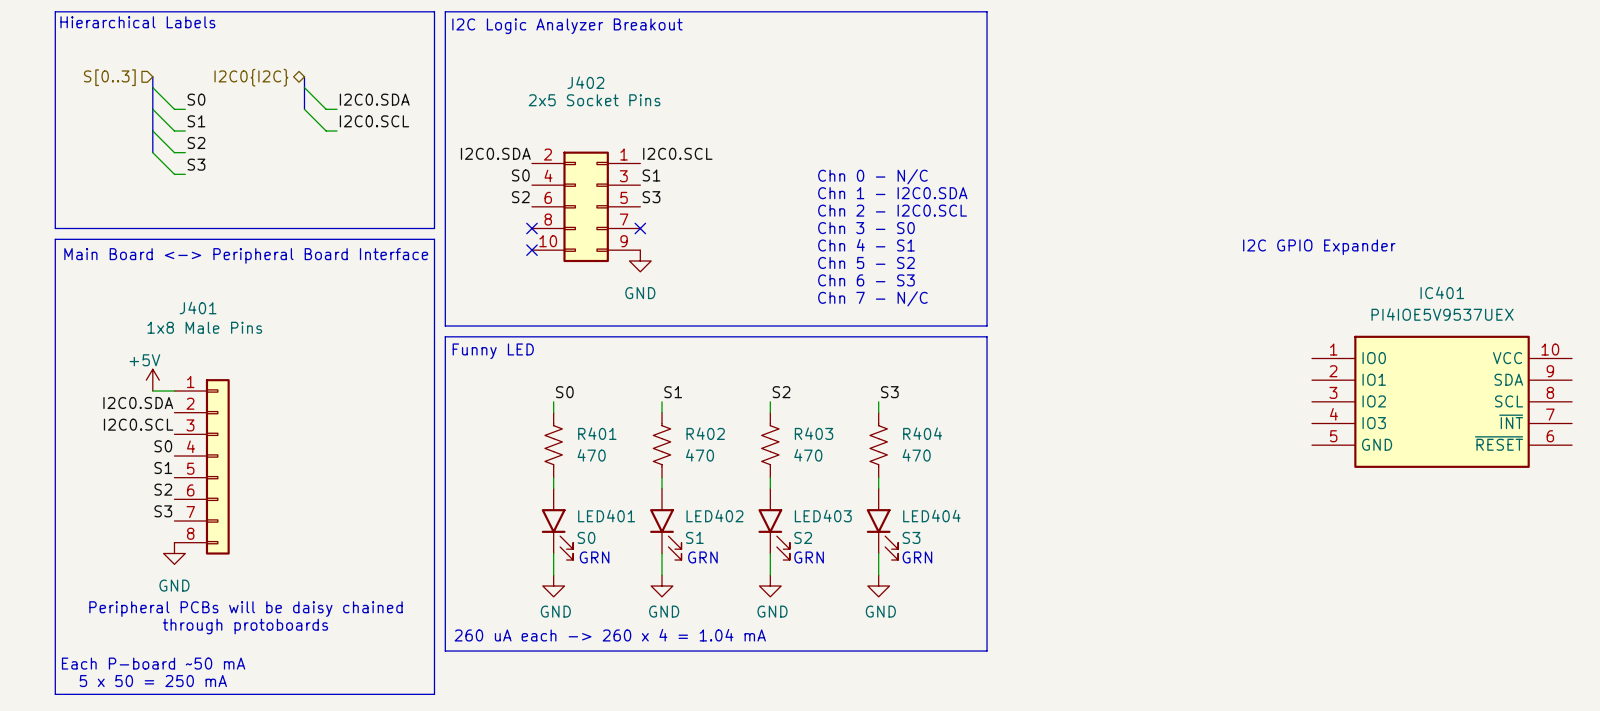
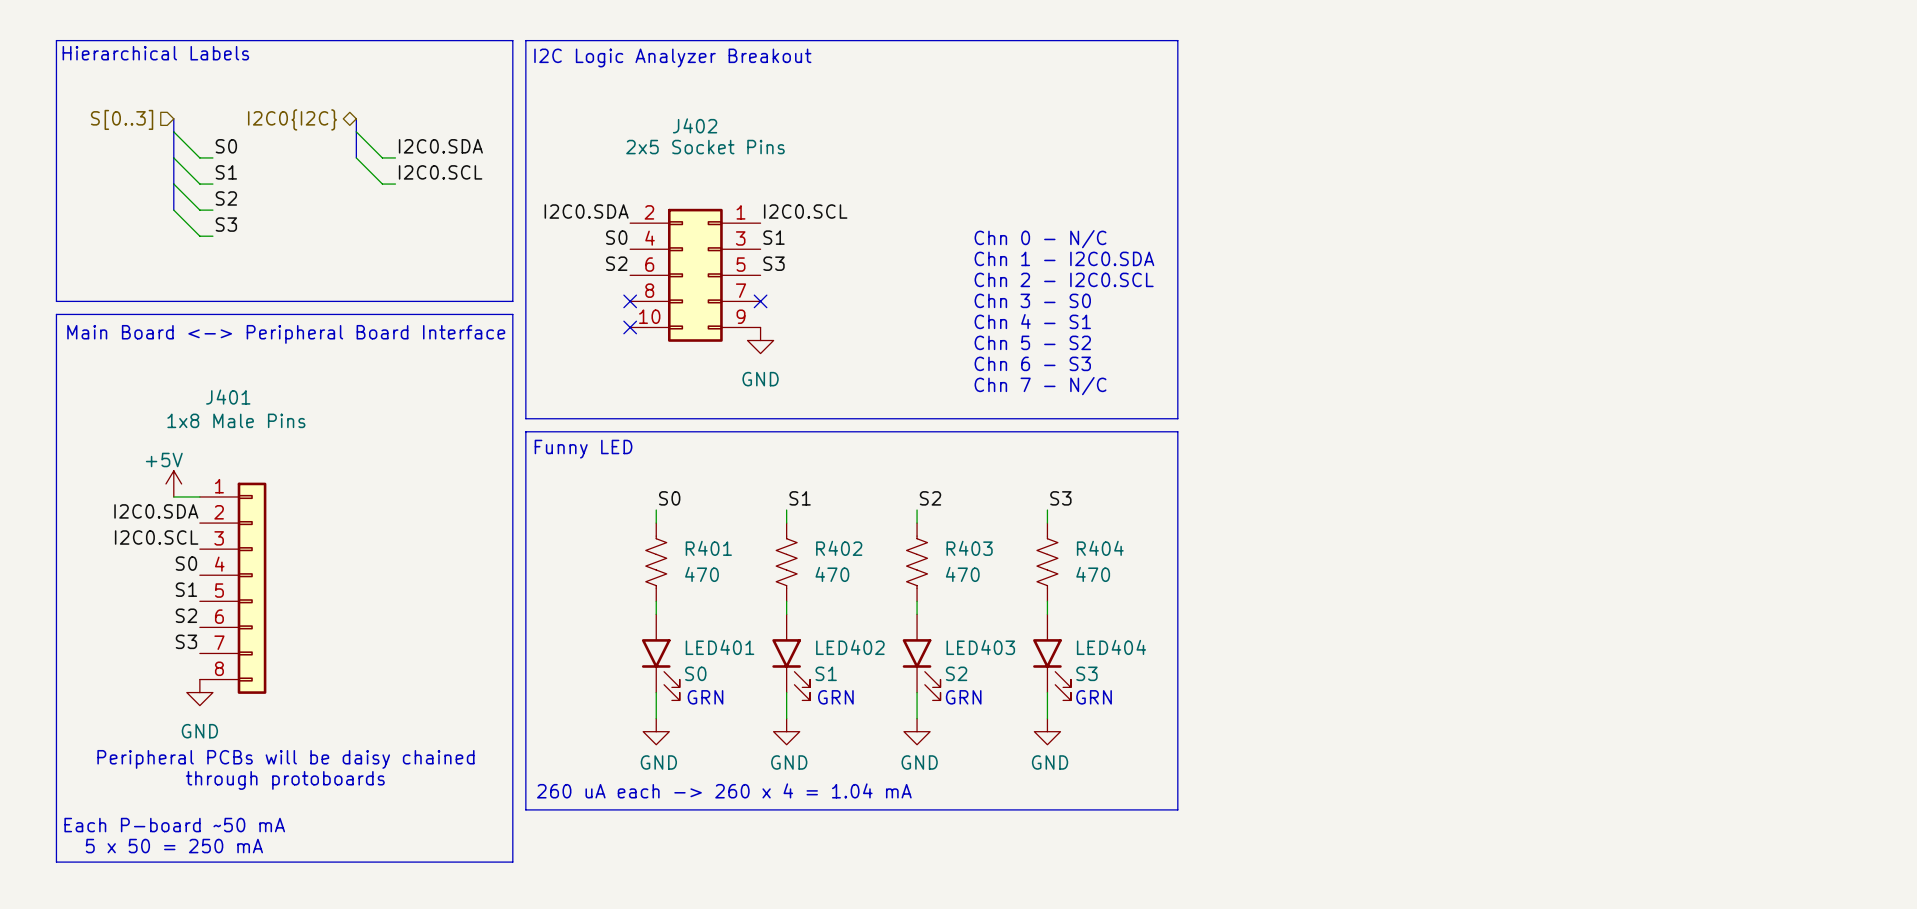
text: I2C GPIO Expander (1319, 247) -> none
IC401: PI4IOE5V9537UEX (1442, 401) -> none

